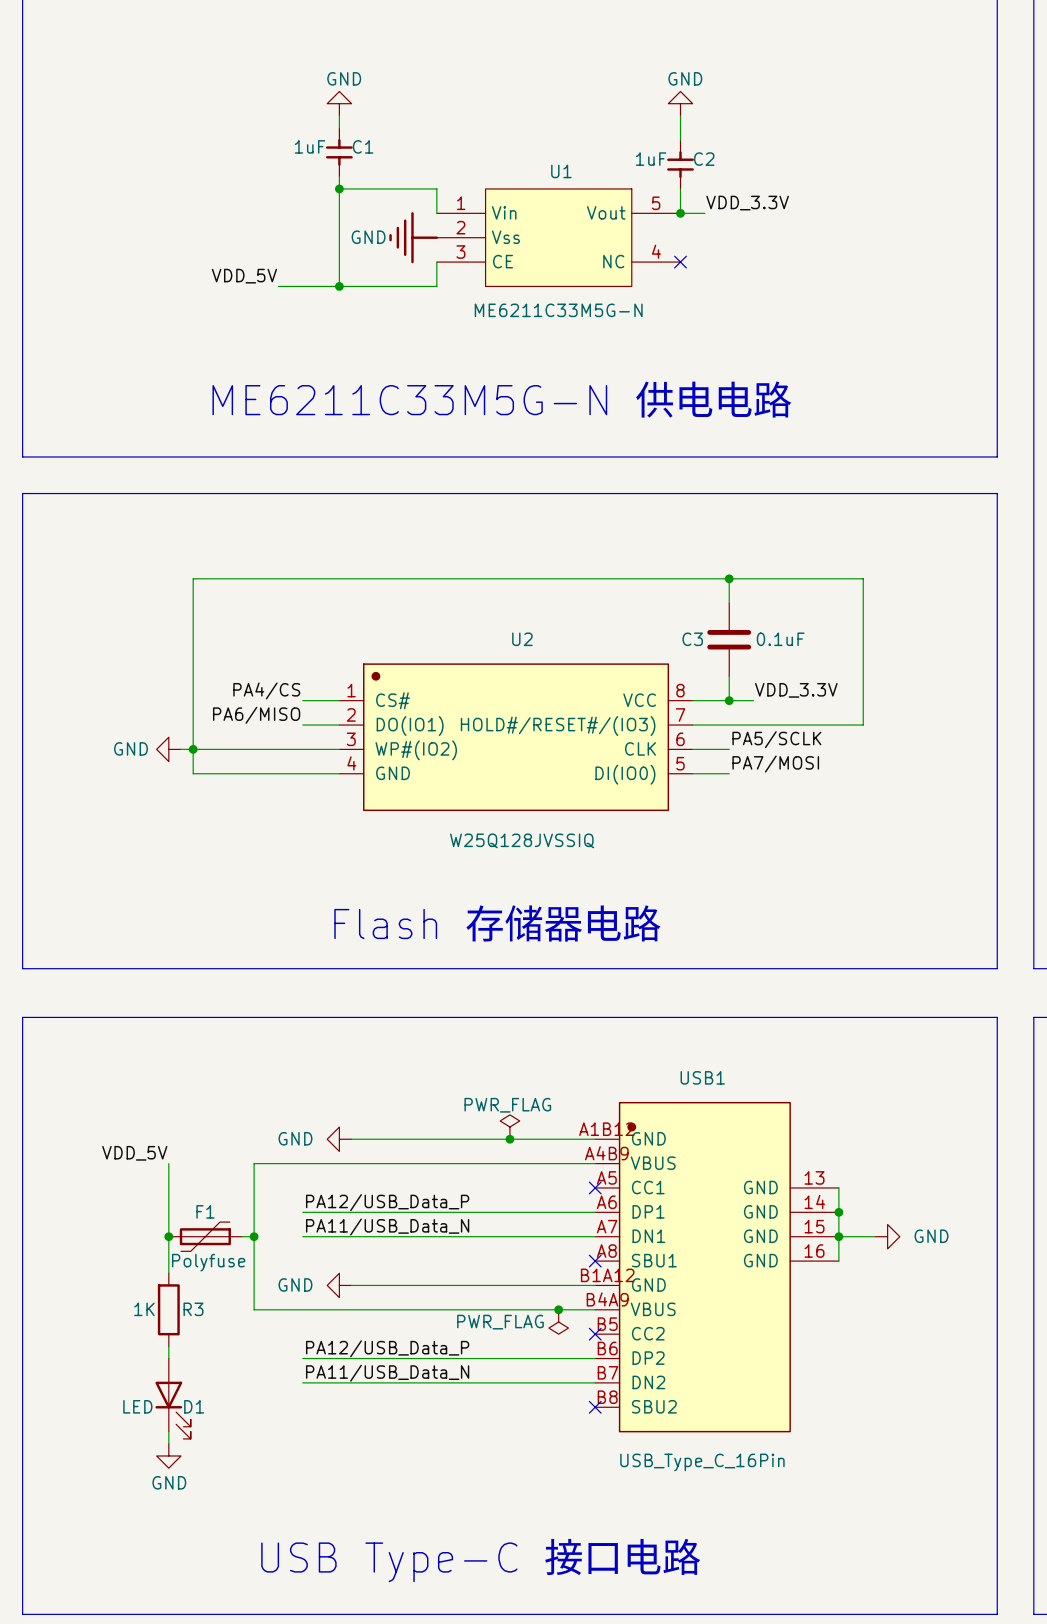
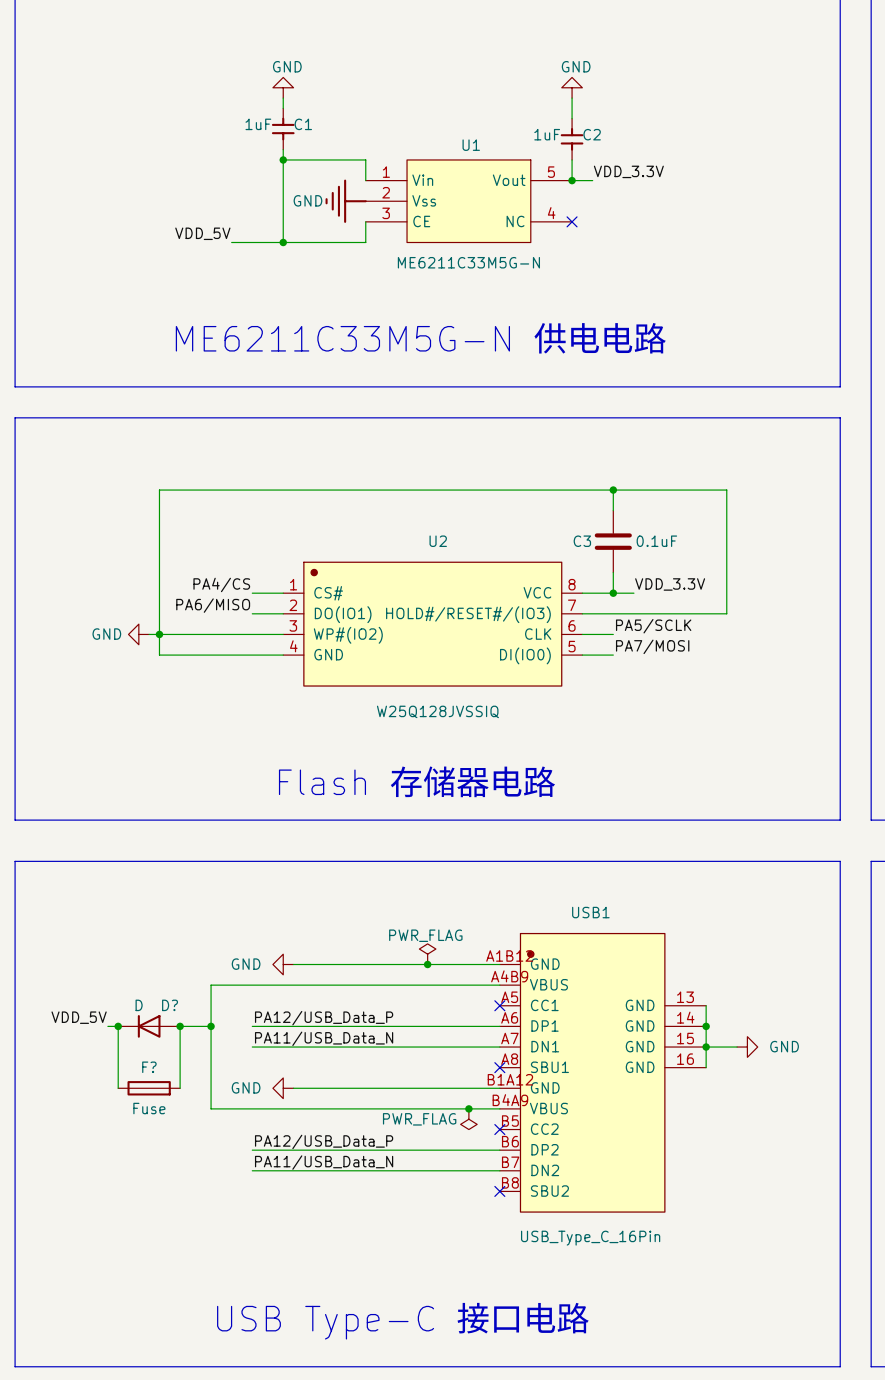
label position: VDD_5V (134, 1153) -> VDD_5V (79, 1017)
wire: (168, 1163) (168, 1273) -> none
wire: none -> (107, 1026) (118, 1026) (118, 1088)
junction: none -> (118, 1026)
D?: none -> D (149, 1026)
junction: none -> (180, 1026)
wire: none -> (211, 1026) (180, 1026) (180, 1088)
junction: none -> (211, 1026)
junction: (168, 1236) -> none
F1: Polyfuse (205, 1236) -> none
wire: (241, 1236) (254, 1236) -> none
junction: (254, 1236) -> none
F?: none -> Fuse (149, 1088)
R3: 1K (168, 1309) -> none
wire: (168, 1346) (168, 1358) -> none
D1: LED (173, 1398) -> none
wire: (168, 1431) (168, 1443) -> none
power symbol: GND (168, 1456) -> none

